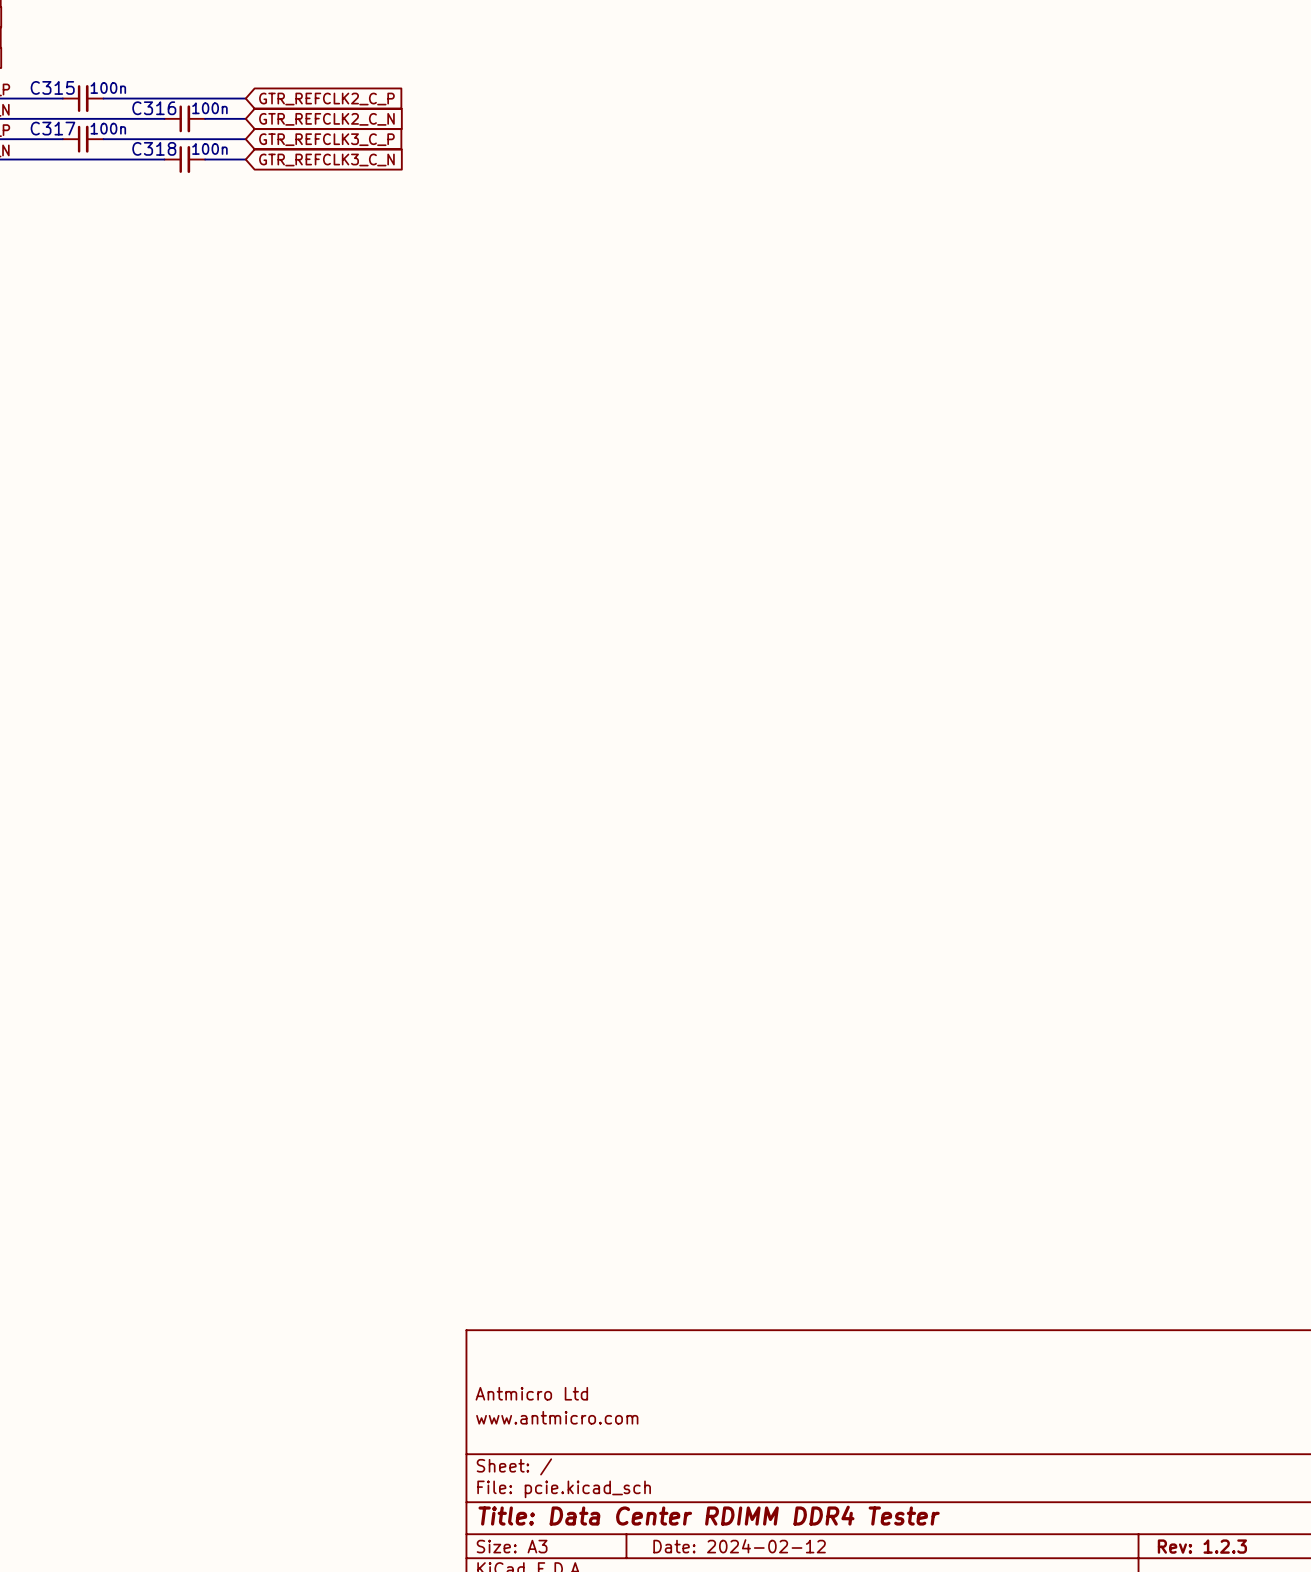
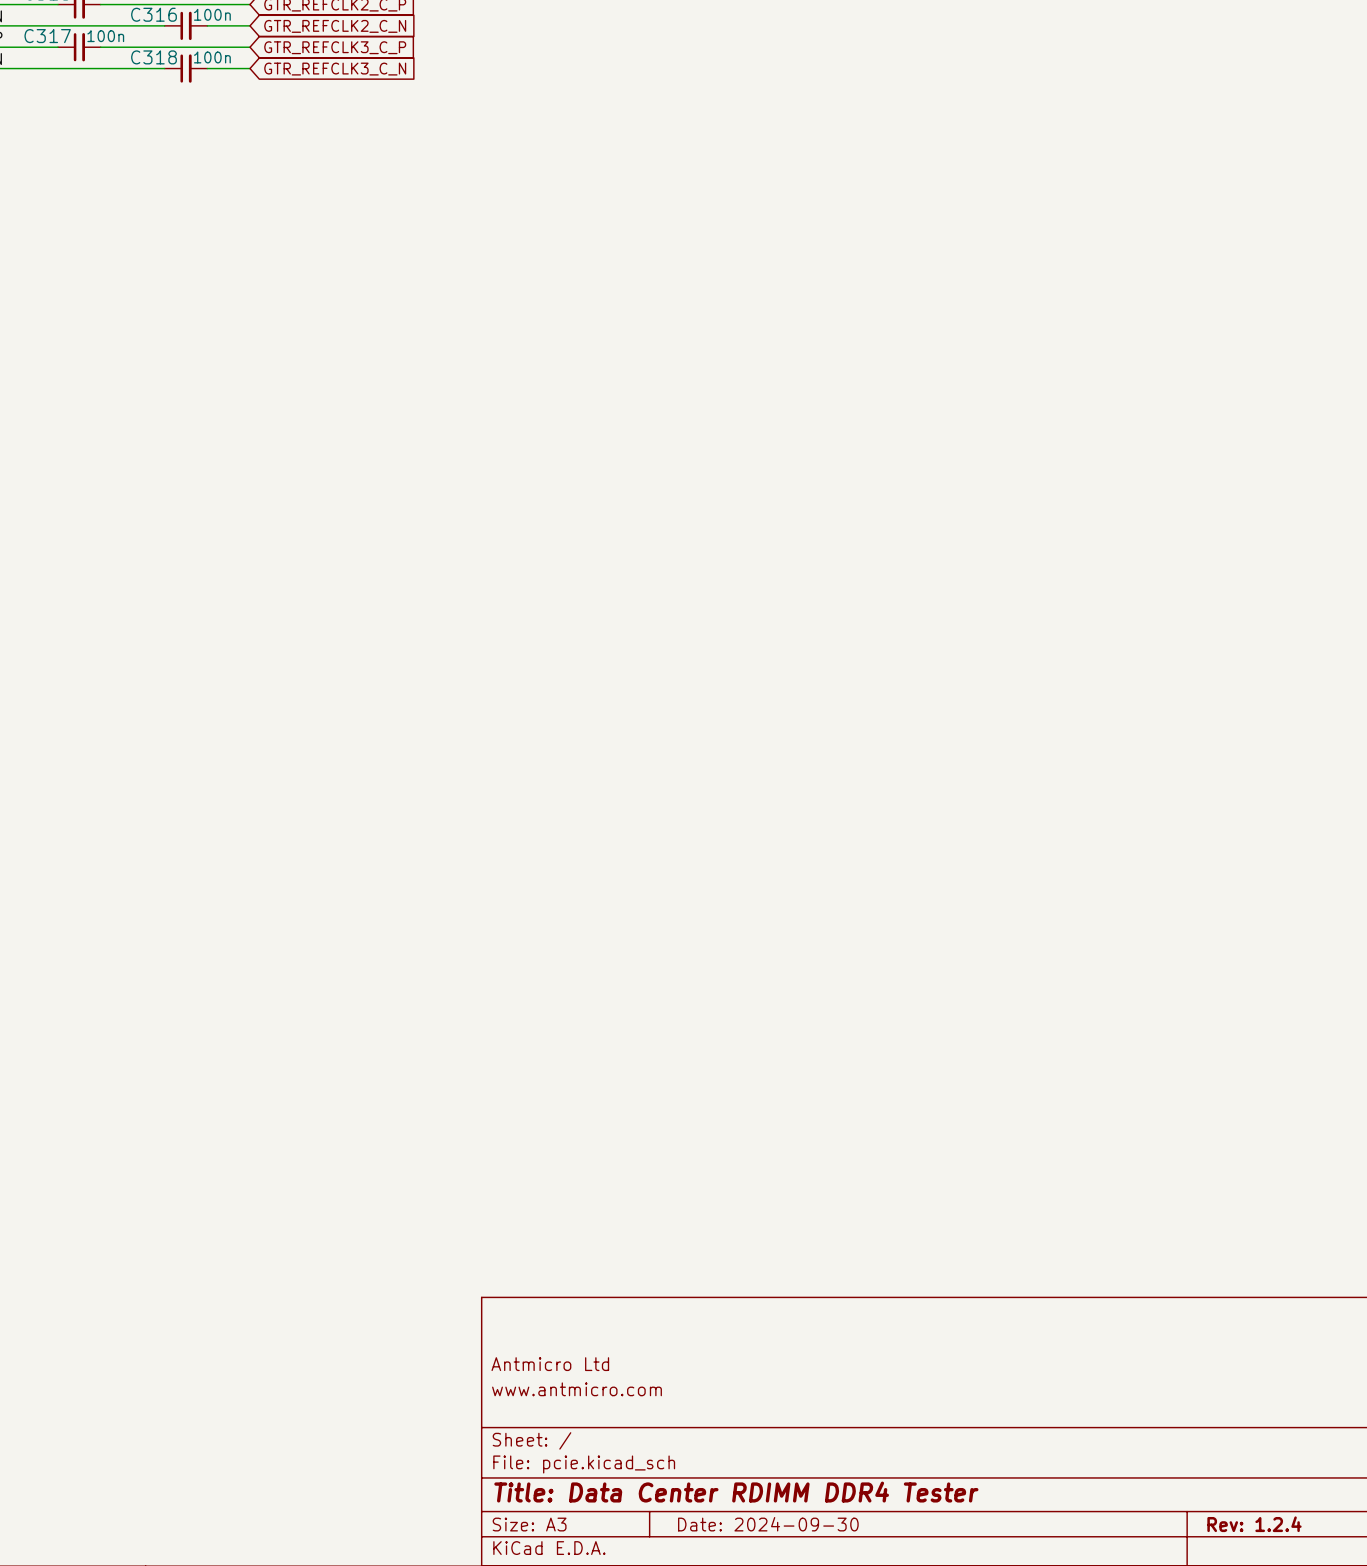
title block: Date: 2024-02-12 (739, 1546) -> Date: 2024-09-30 (768, 1524)
title block: Rev: 1.2.3 (1202, 1546) -> Rev: 1.2.4 (1254, 1524)

